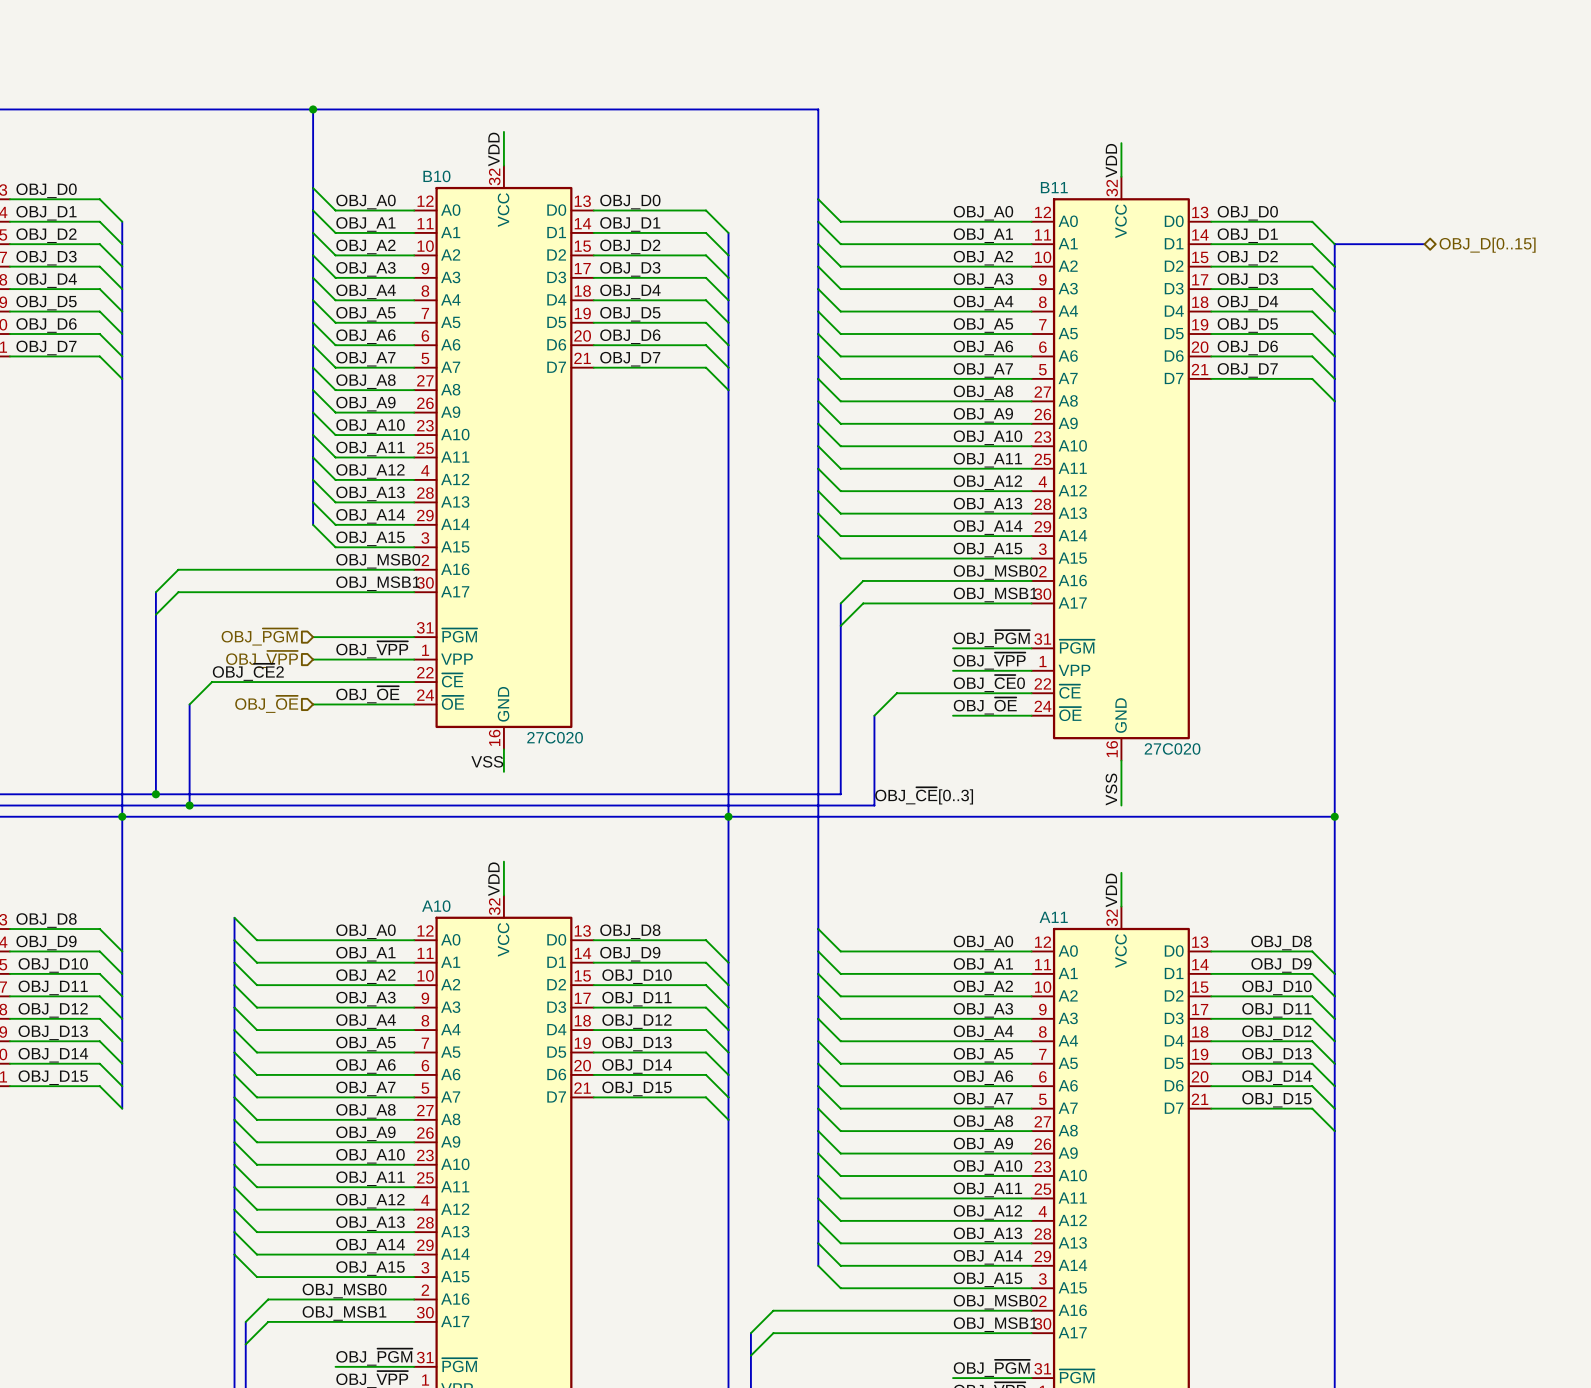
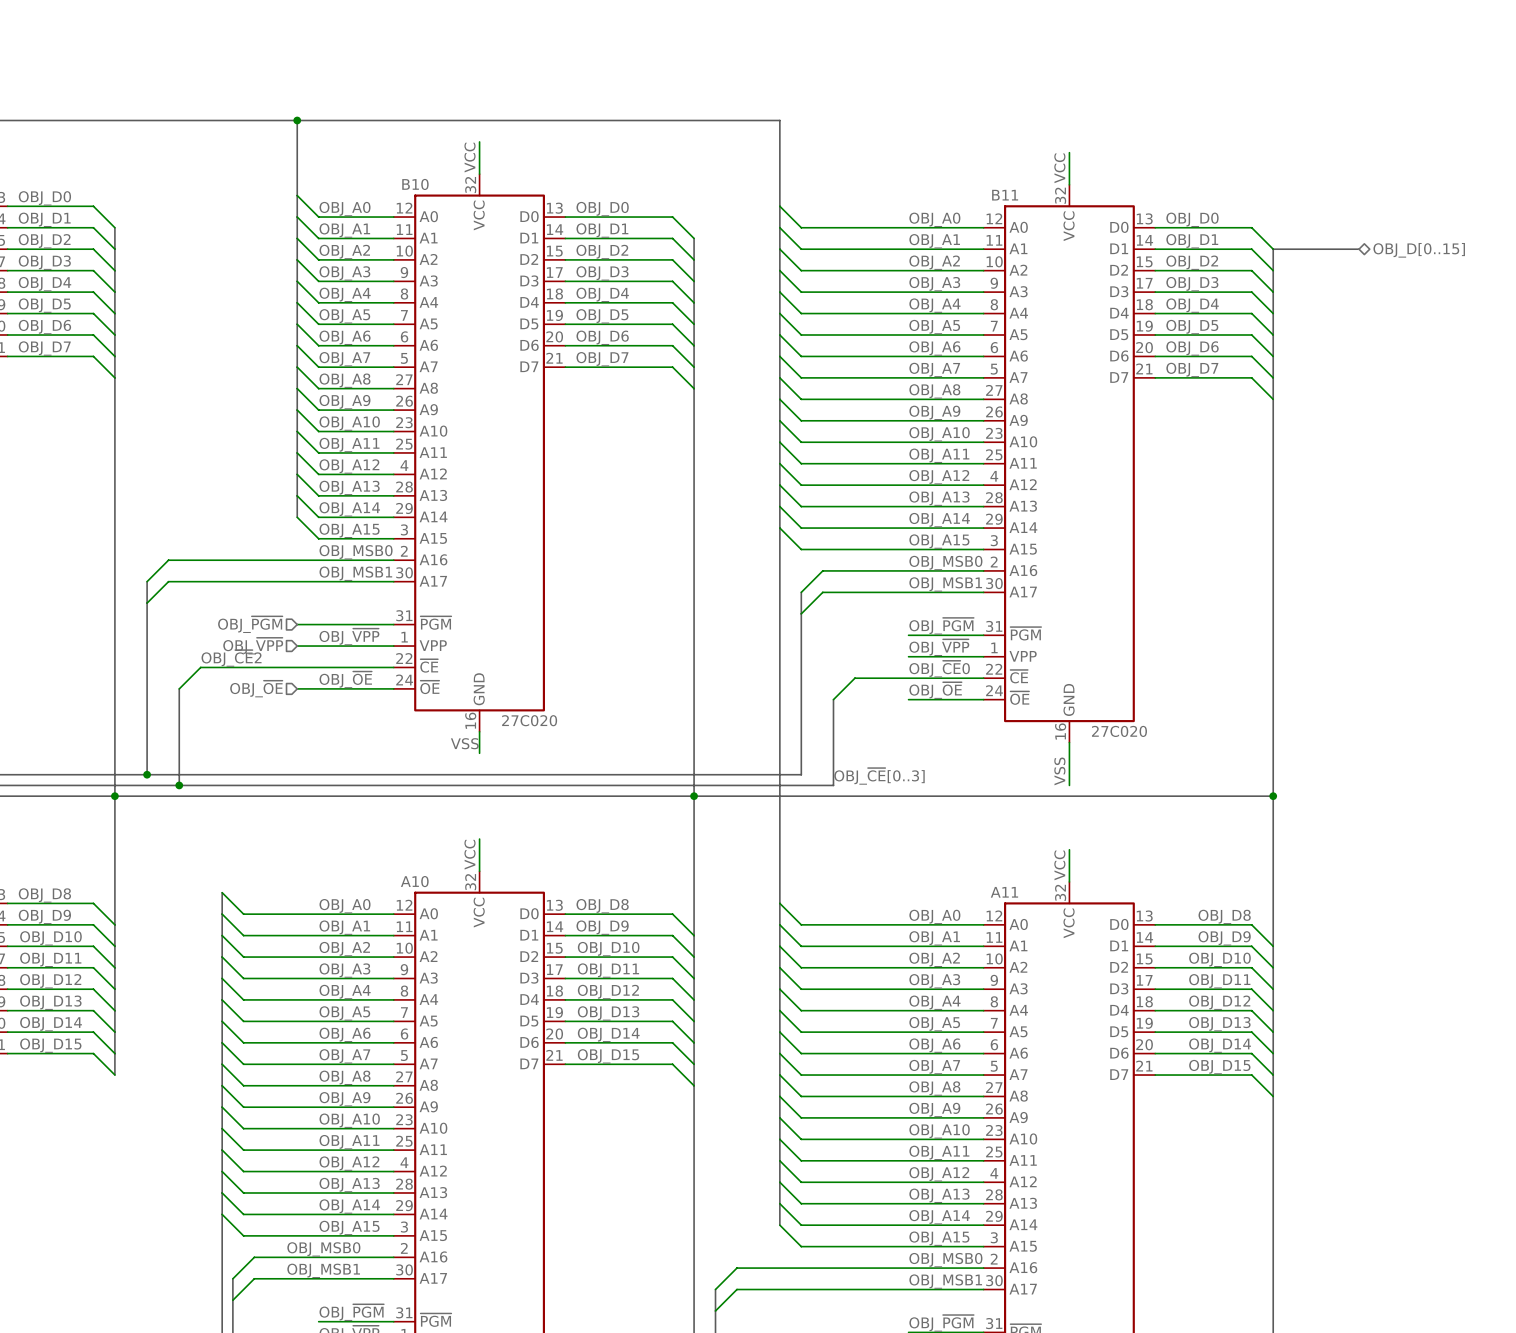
label: VDD (493, 149) -> VCC (470, 157)
label: VDD (1111, 160) -> VCC (1059, 168)
label: VDD (493, 879) -> VCC (470, 854)
label: VDD (1111, 890) -> VCC (1059, 865)

